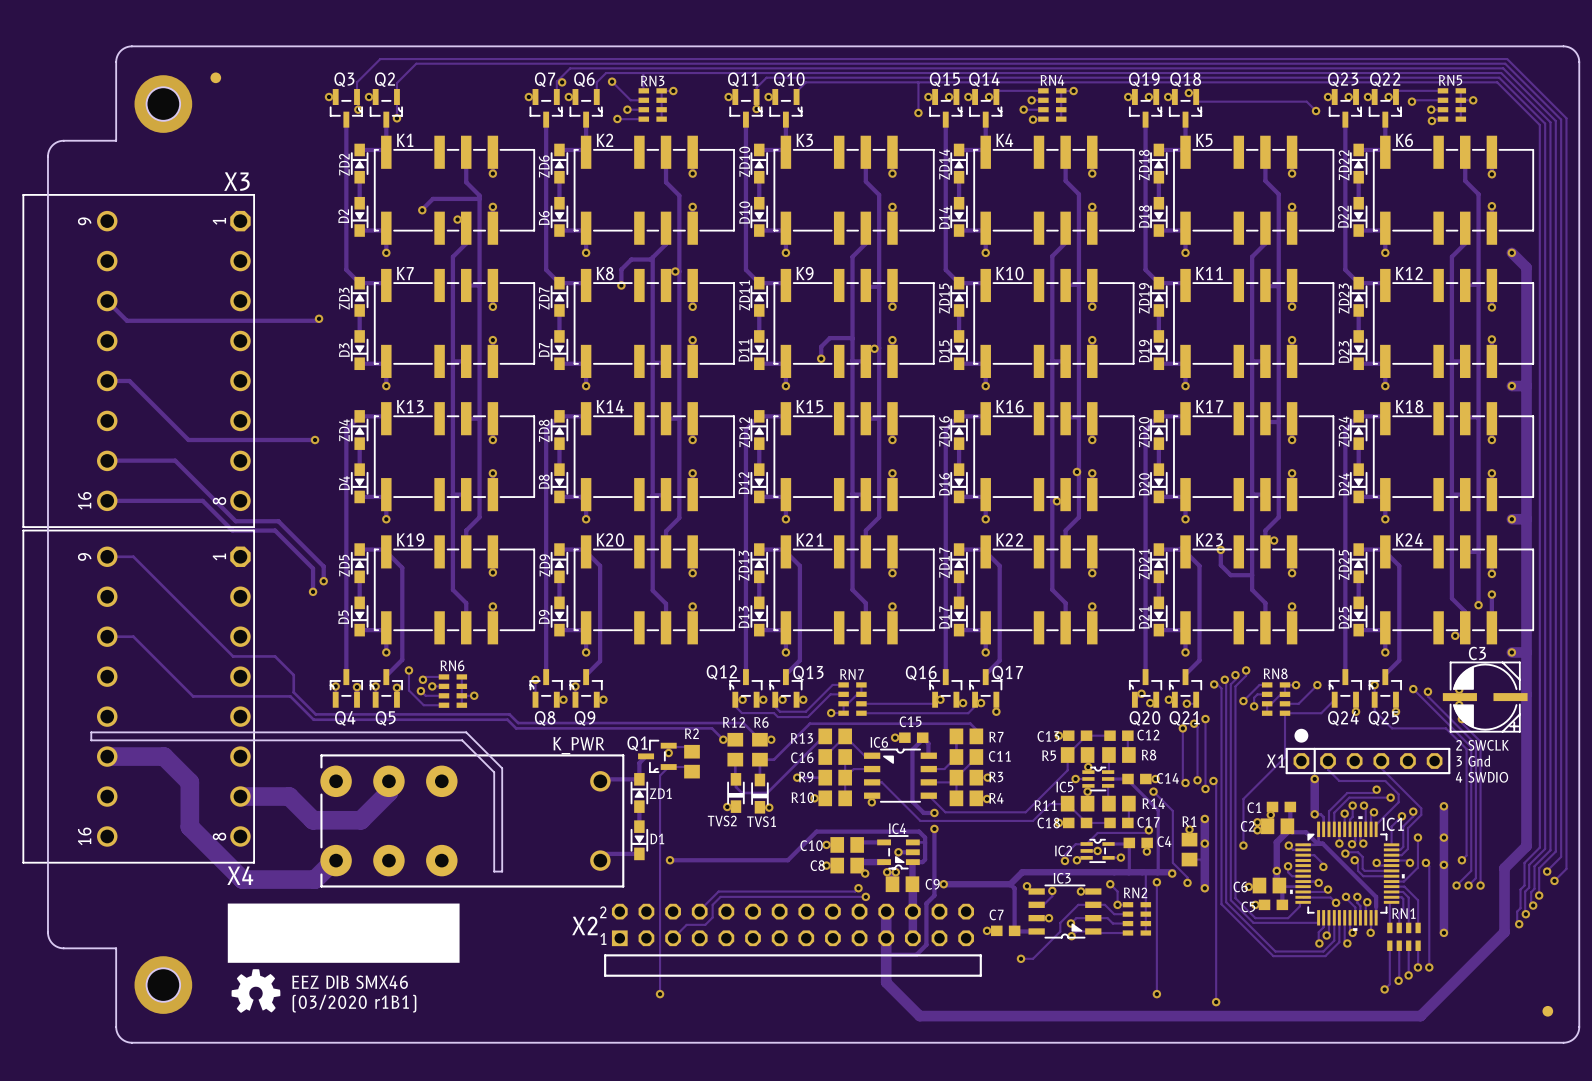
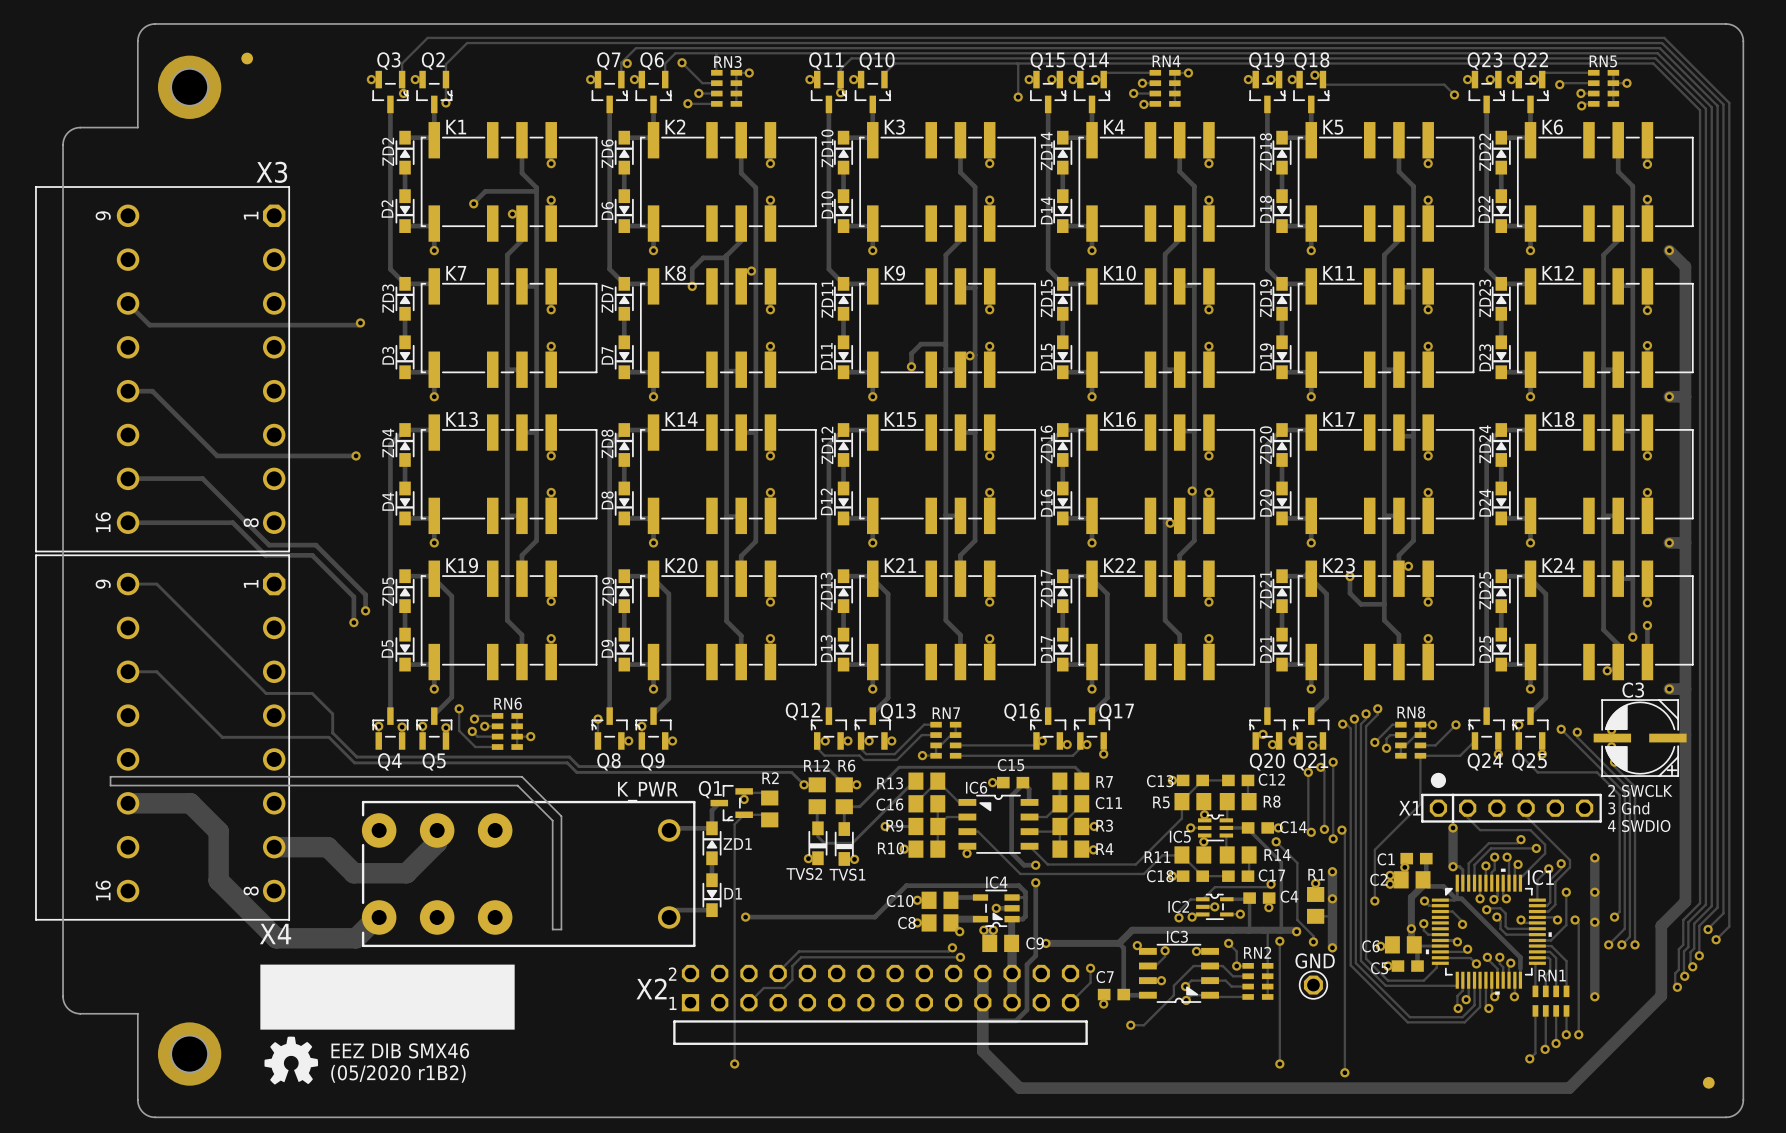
track: none -> (1090, 968) (1090, 982) (1070, 1002)
via: none -> (1090, 968)
GND: none -> (1313, 985)
via: (987, 930) -> none
via: none -> (1103, 1004)
text: (03/2020 r1B1) (354, 1003) -> (05/2020 r1B2) (398, 1073)

